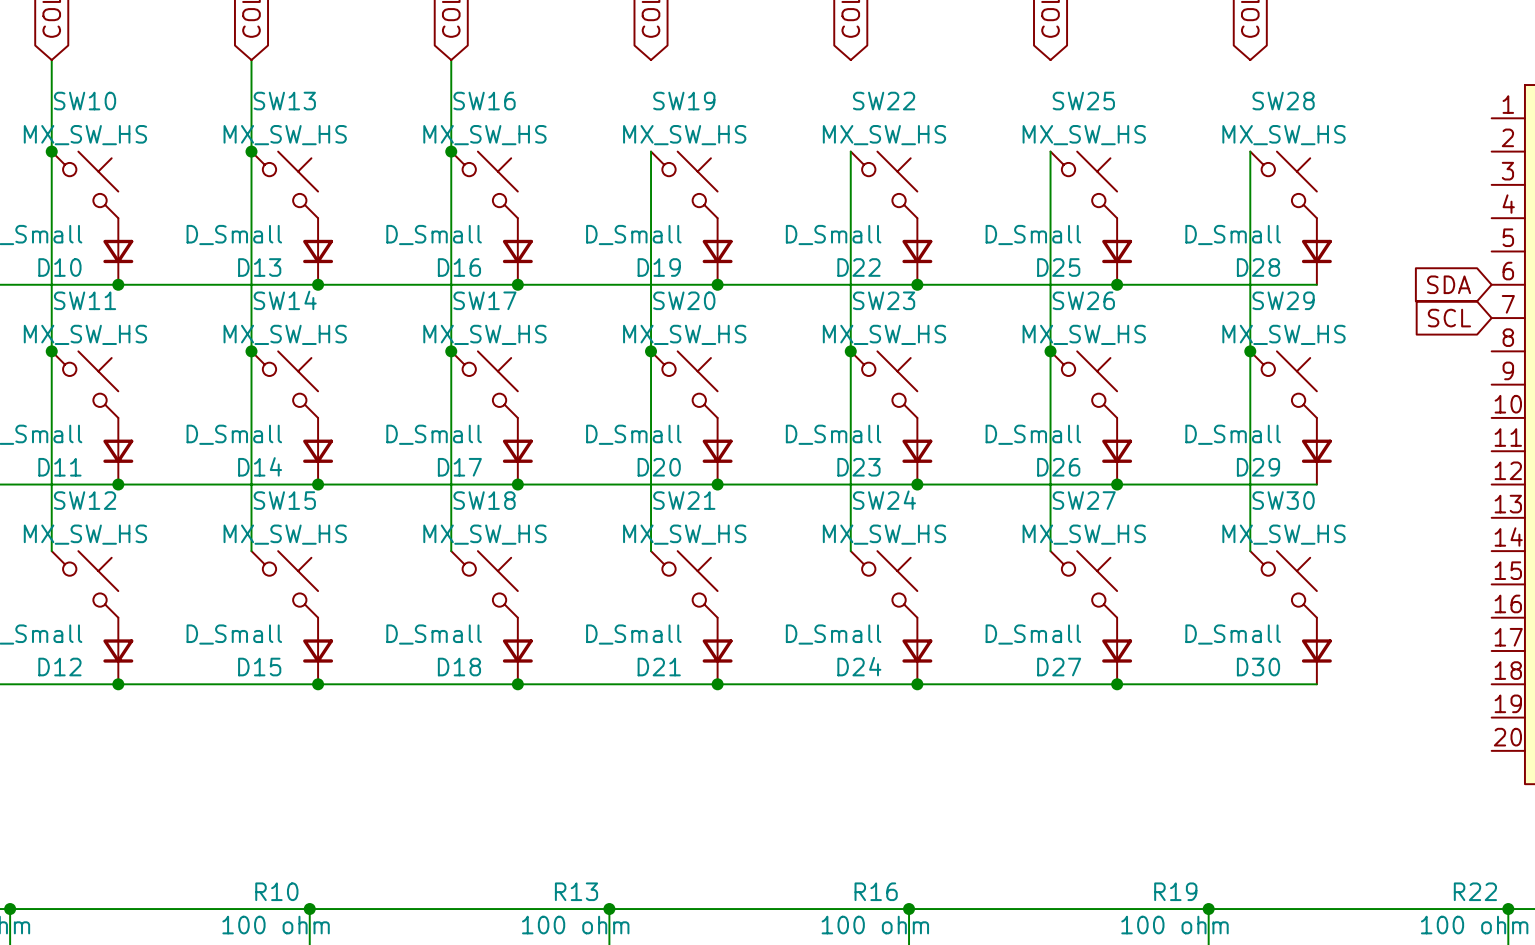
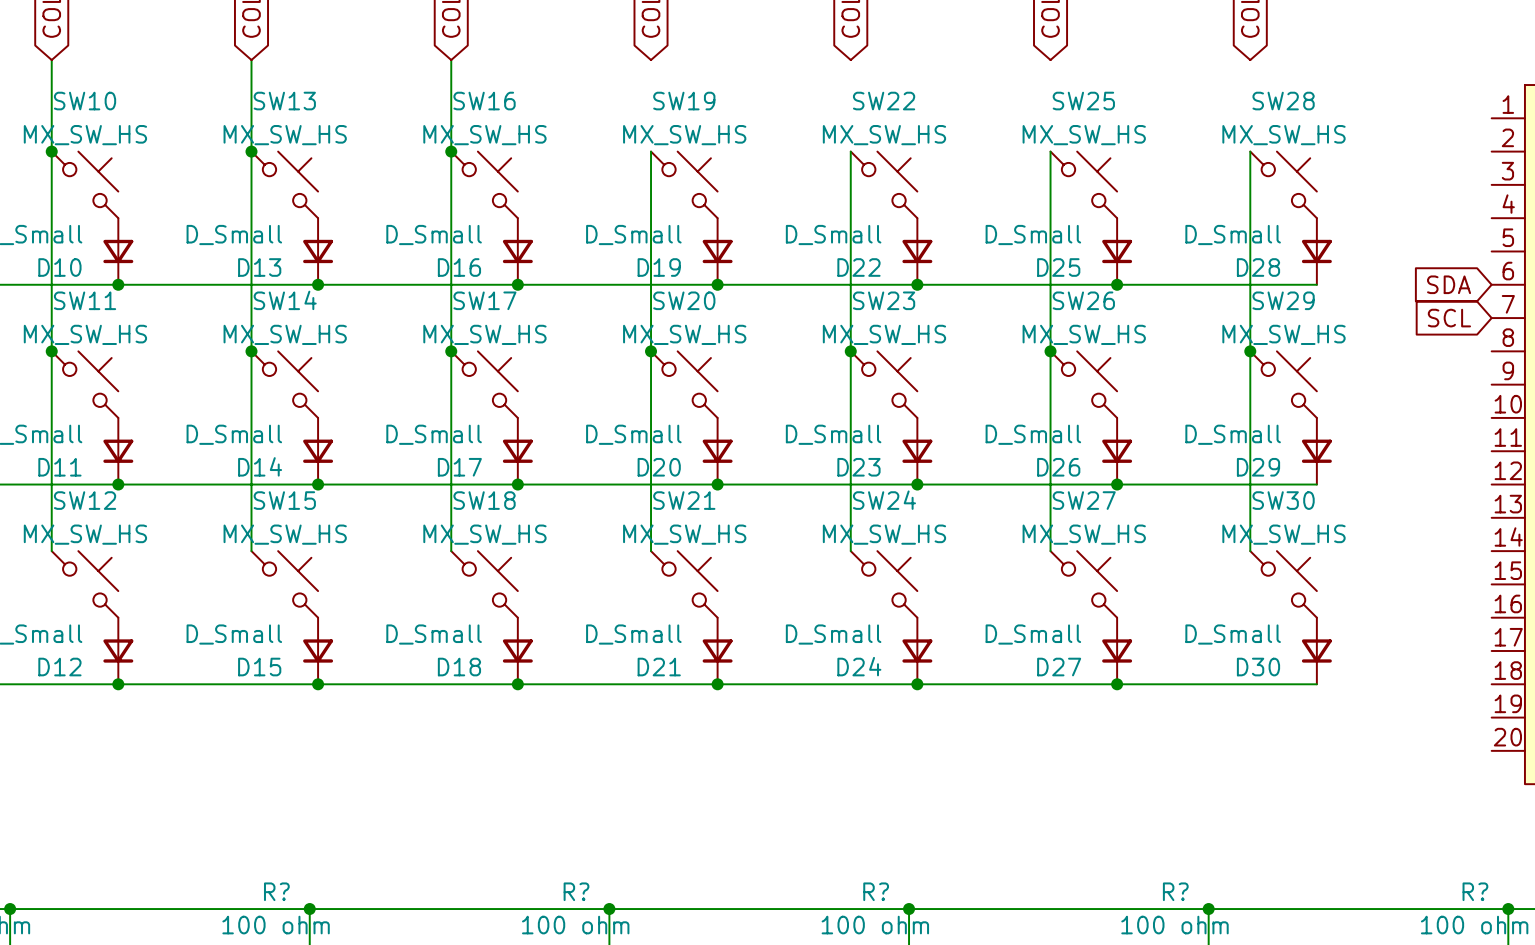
R10 name: R10 (276, 891) -> R? (276, 891)
R13 name: R13 (576, 891) -> R? (576, 891)
R16 name: R16 (876, 891) -> R? (876, 891)
R19 name: R19 (1175, 891) -> R? (1175, 891)
R22 name: R22 (1475, 891) -> R? (1475, 891)

